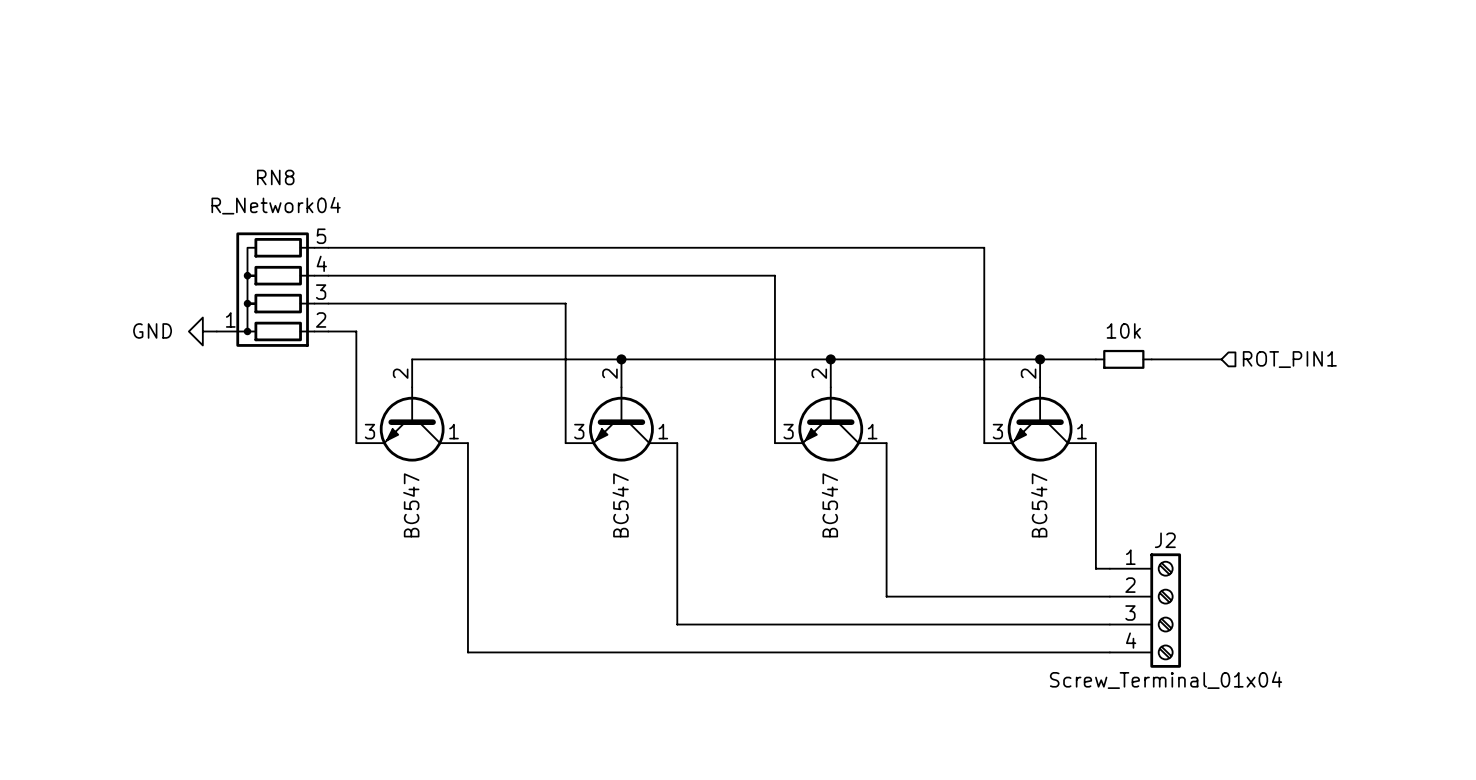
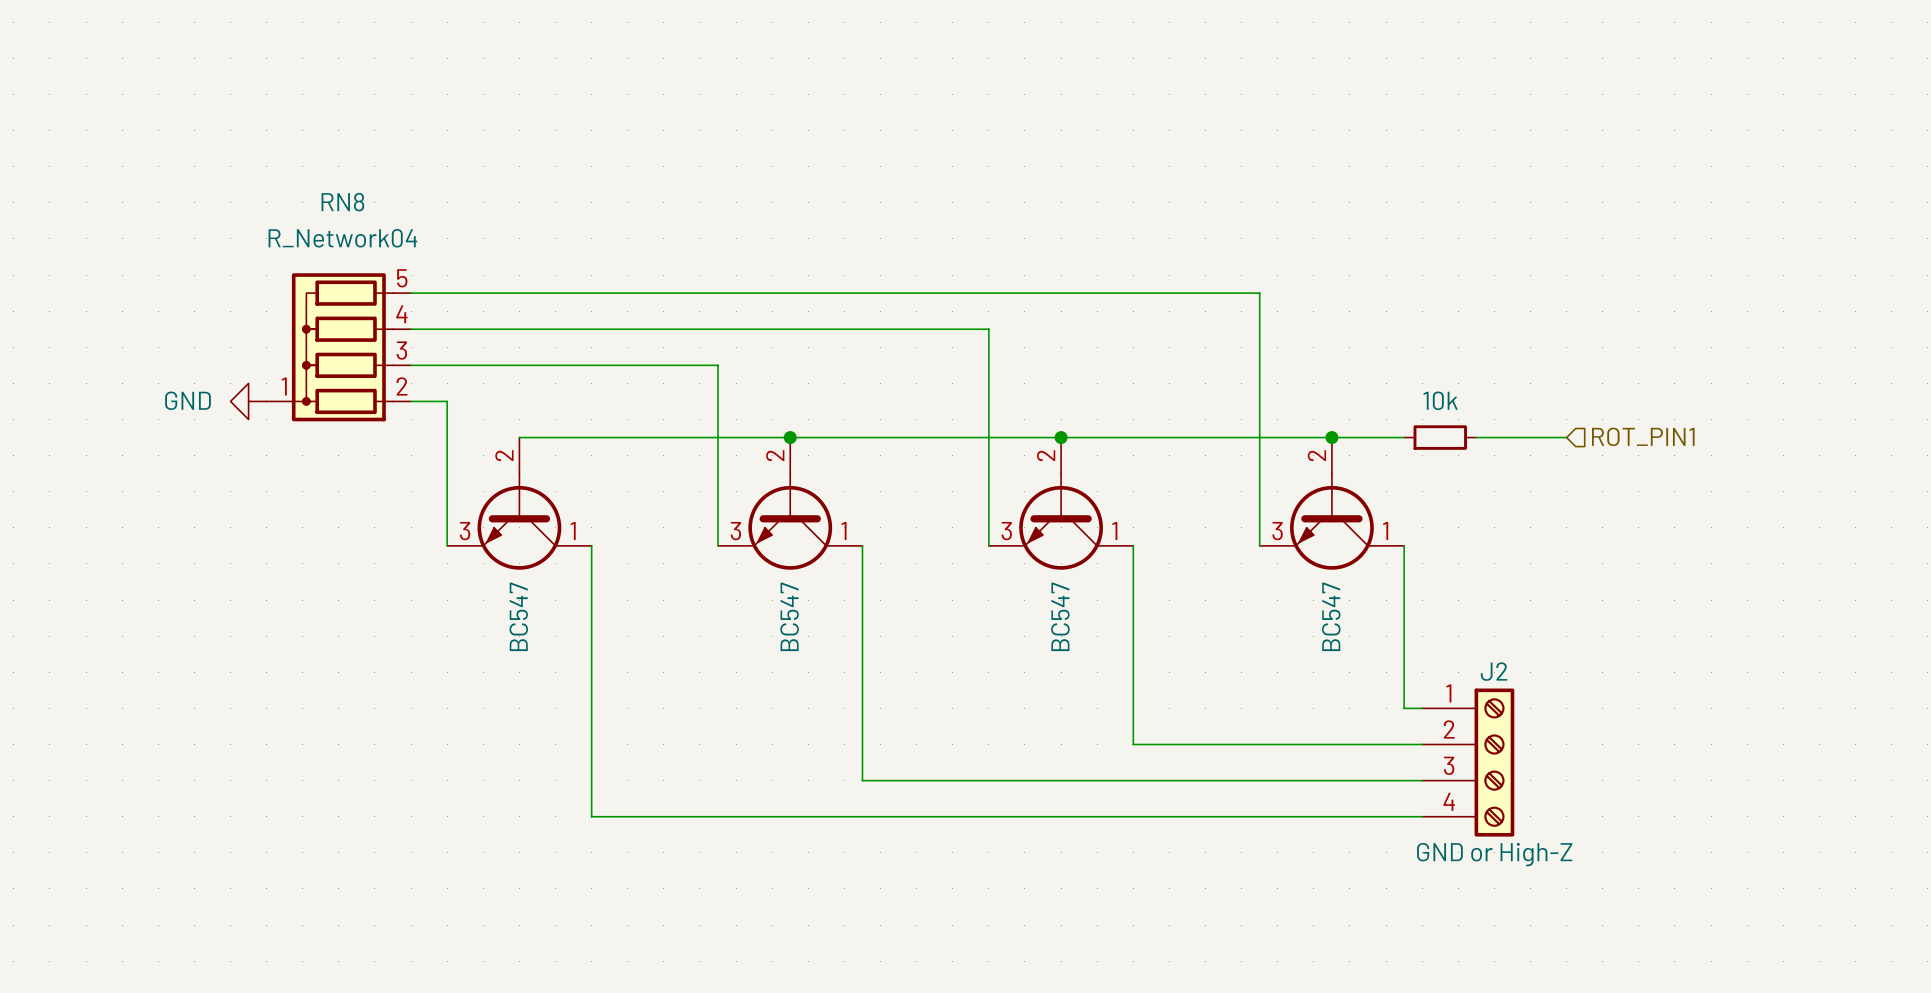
J2 value: Screw_Terminal_01x04 (1166, 680) -> GND or High-Z (1494, 854)

